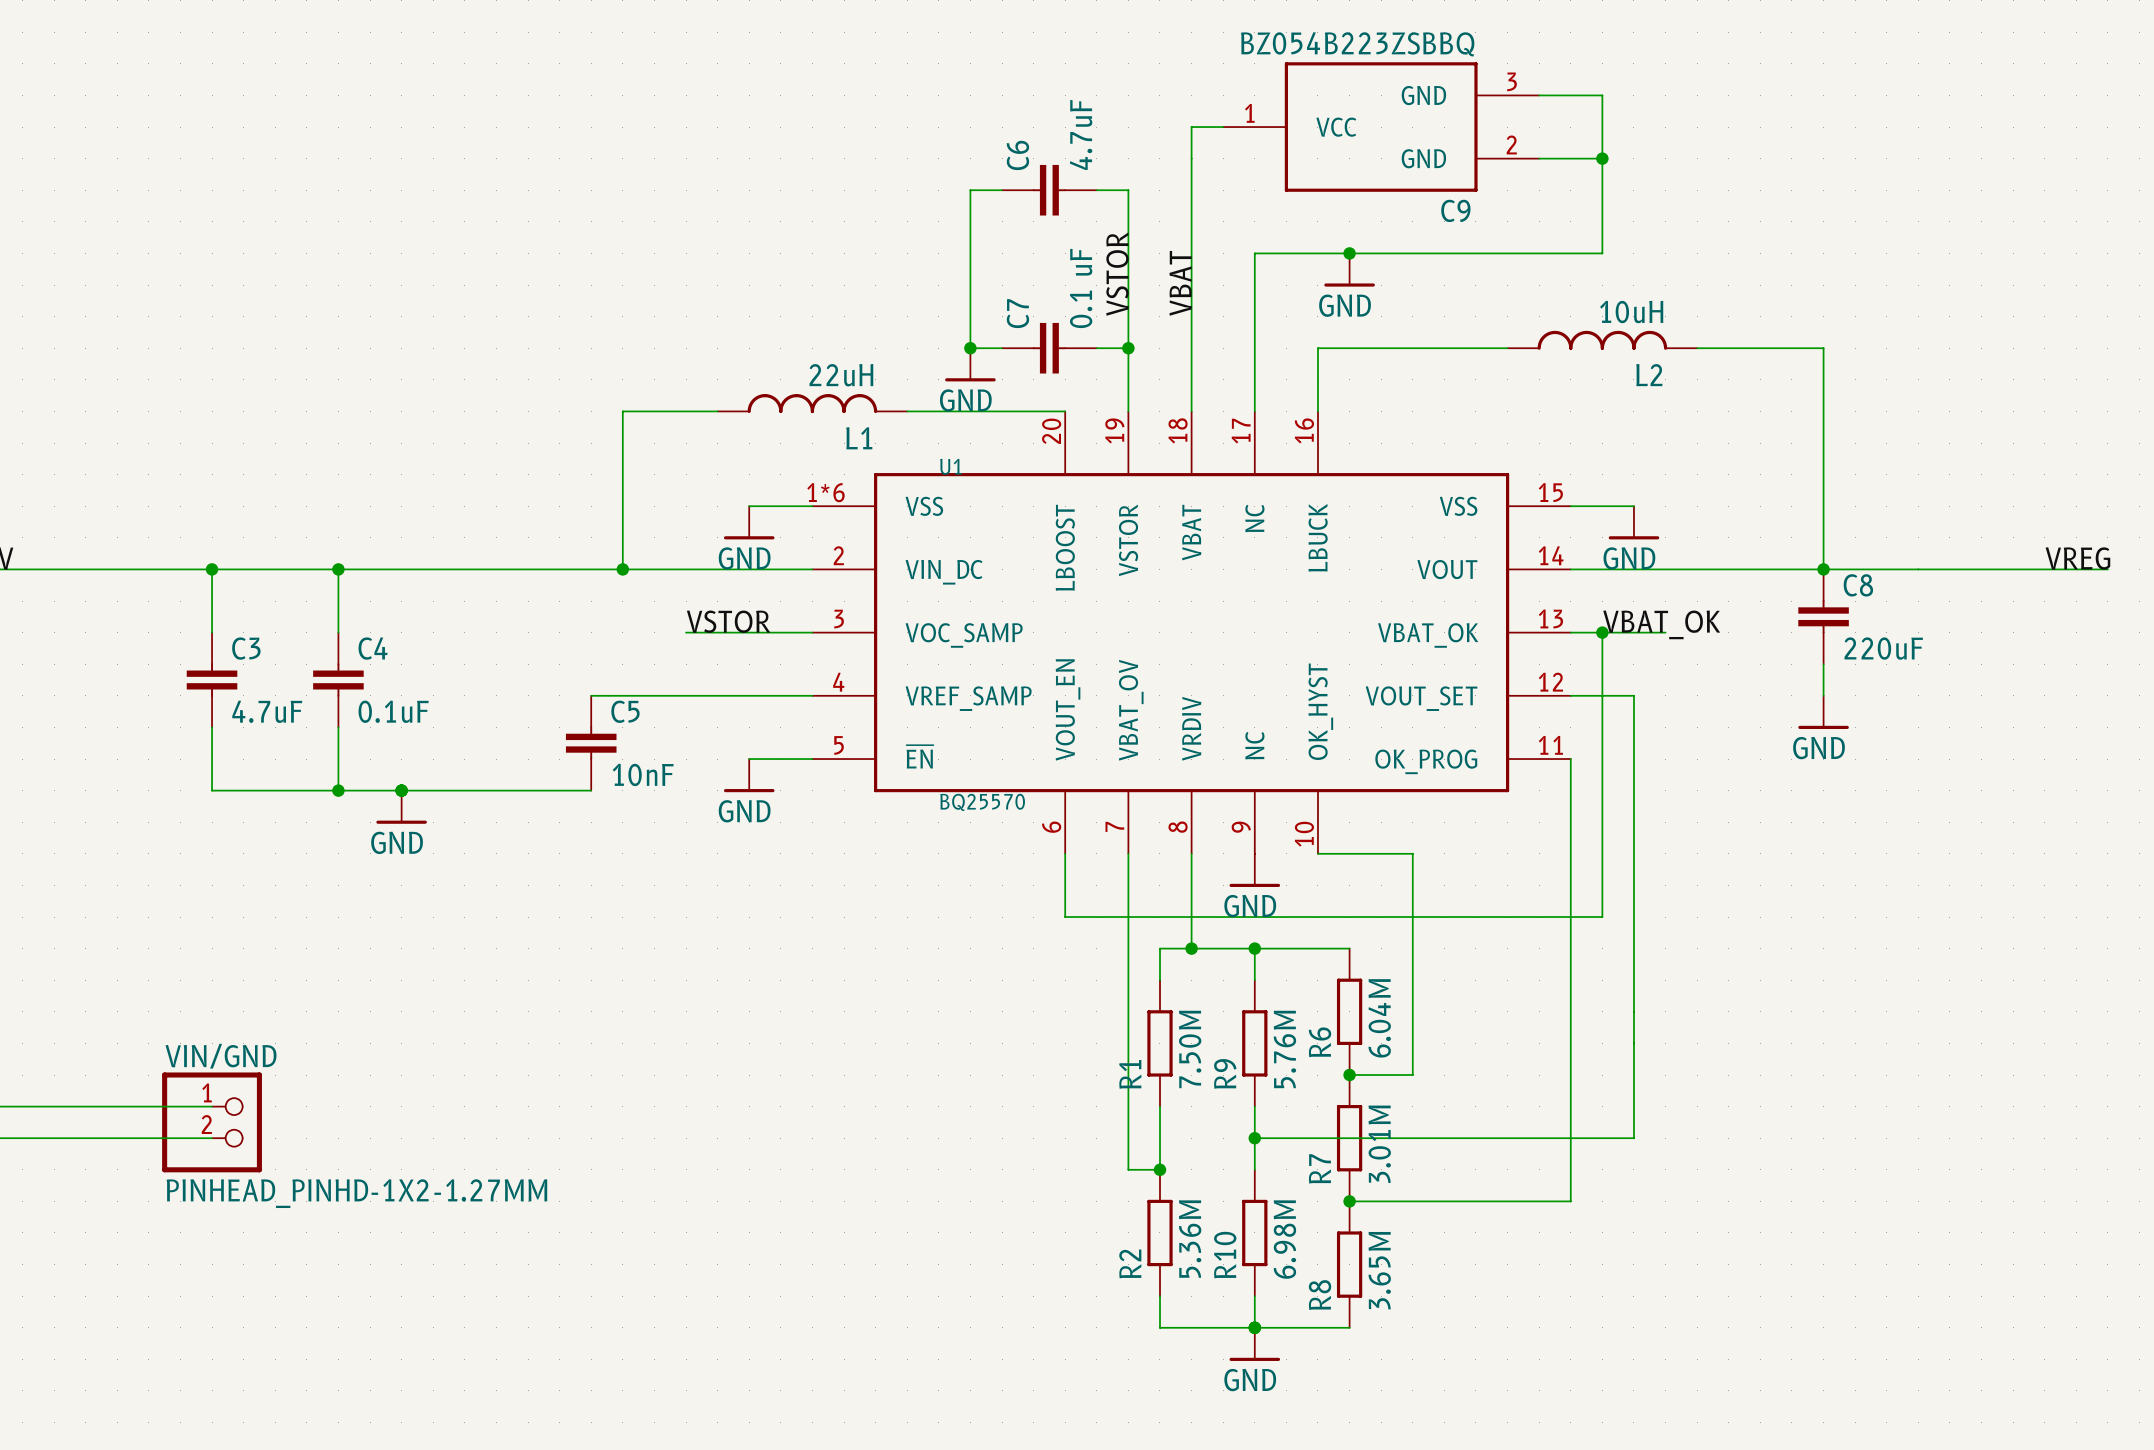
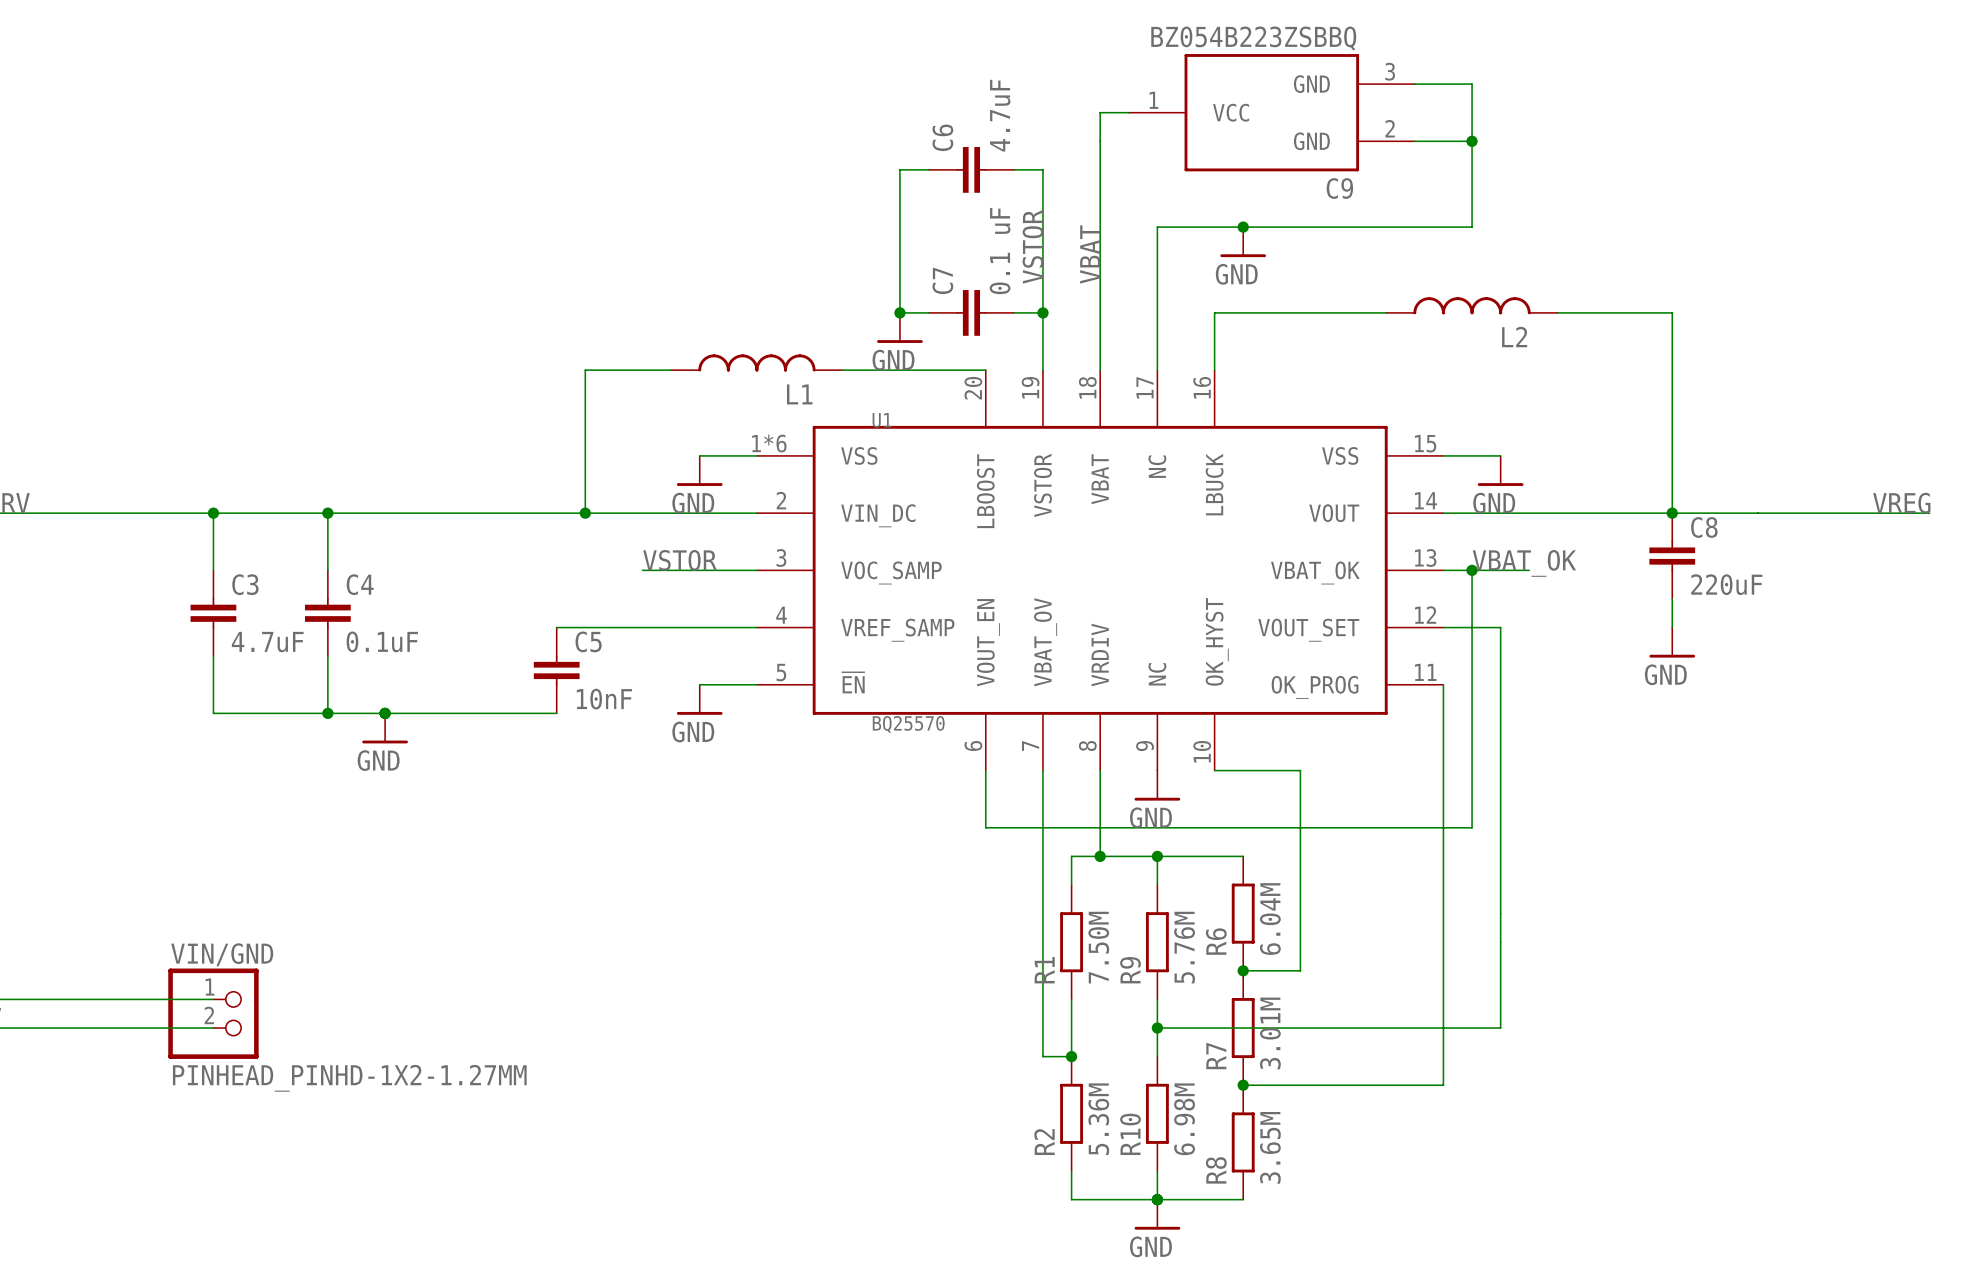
L2 value: 10uH (1631, 312) -> none
L1 value: 22uH (841, 375) -> none

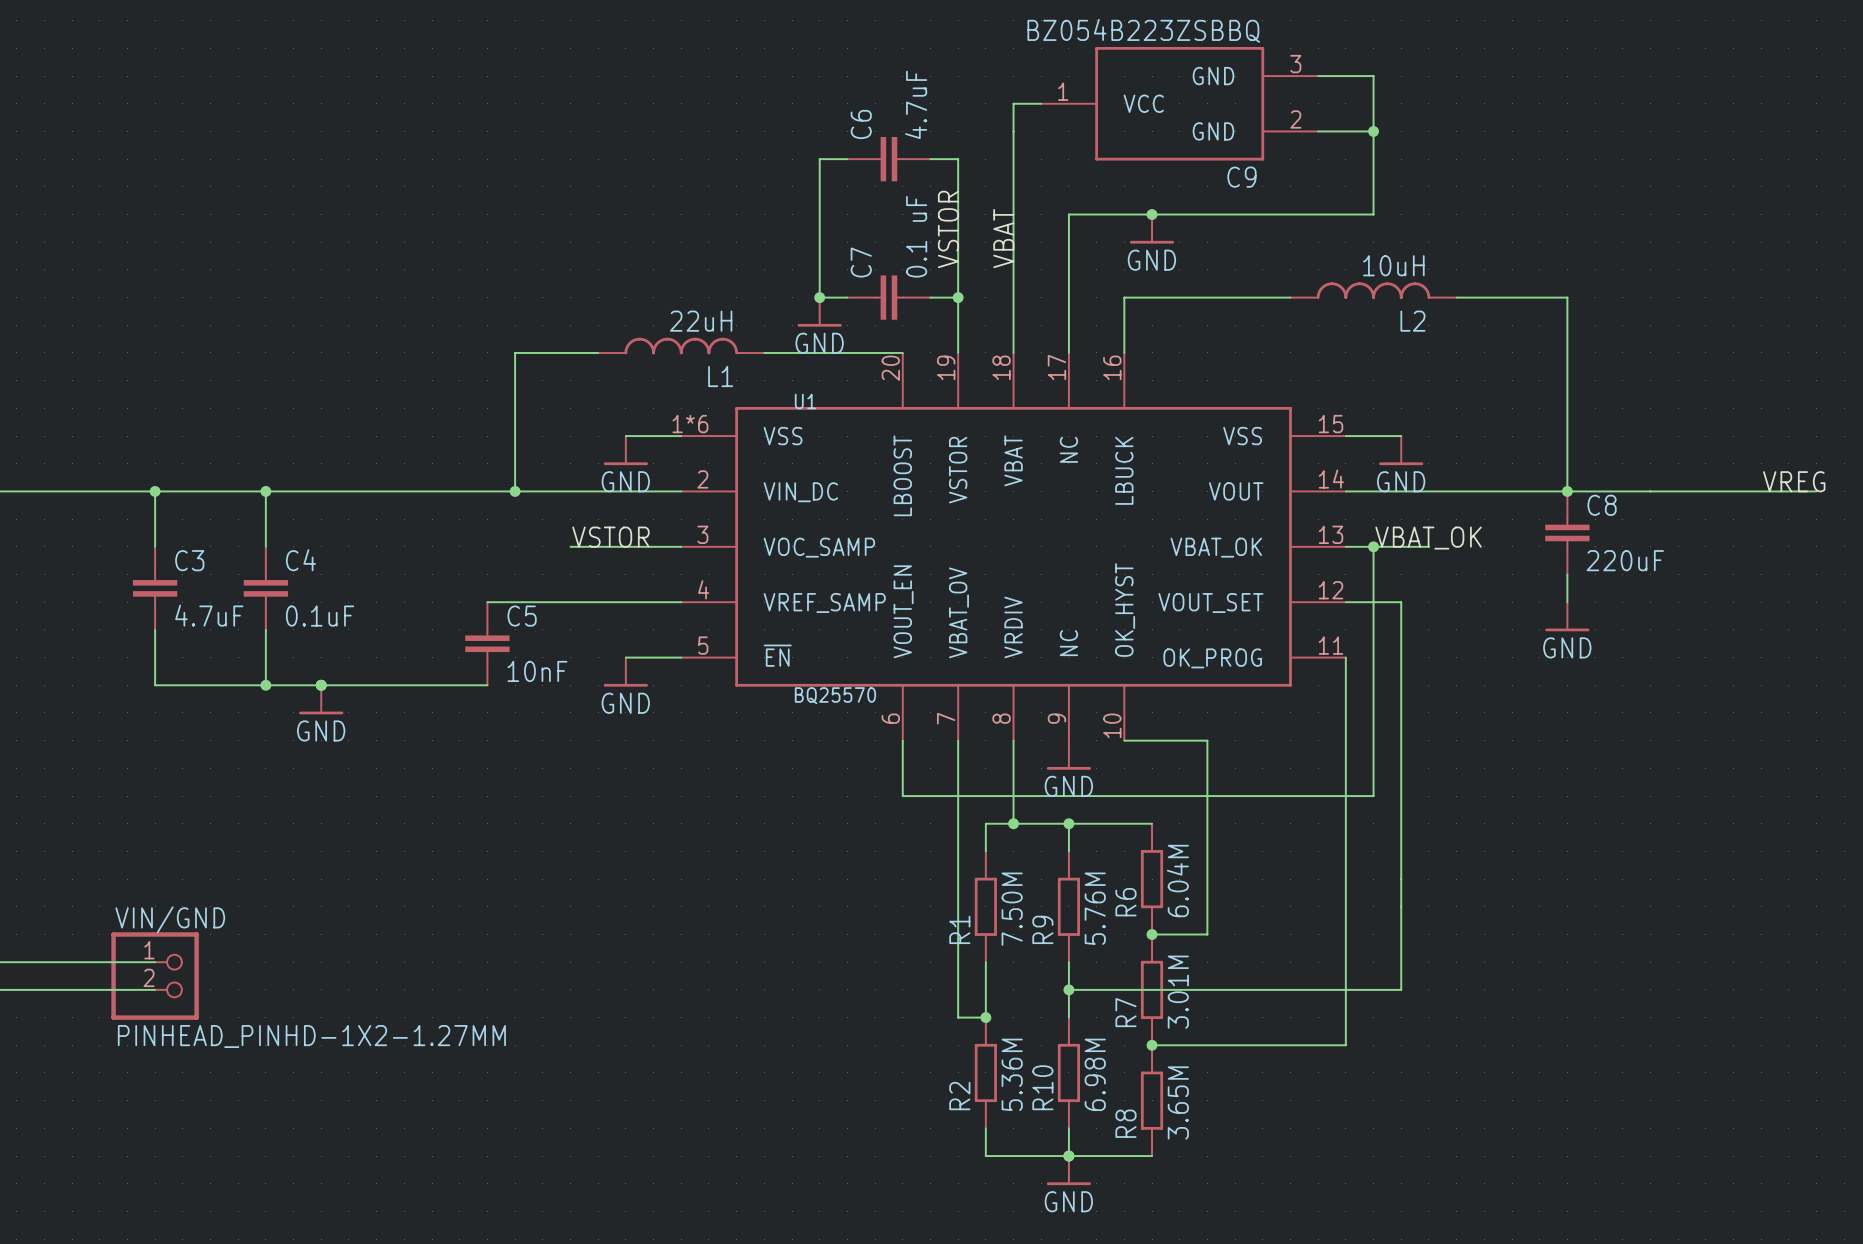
L2 value: none -> 10uH (1393, 265)
L1 value: none -> 22uH (701, 321)

